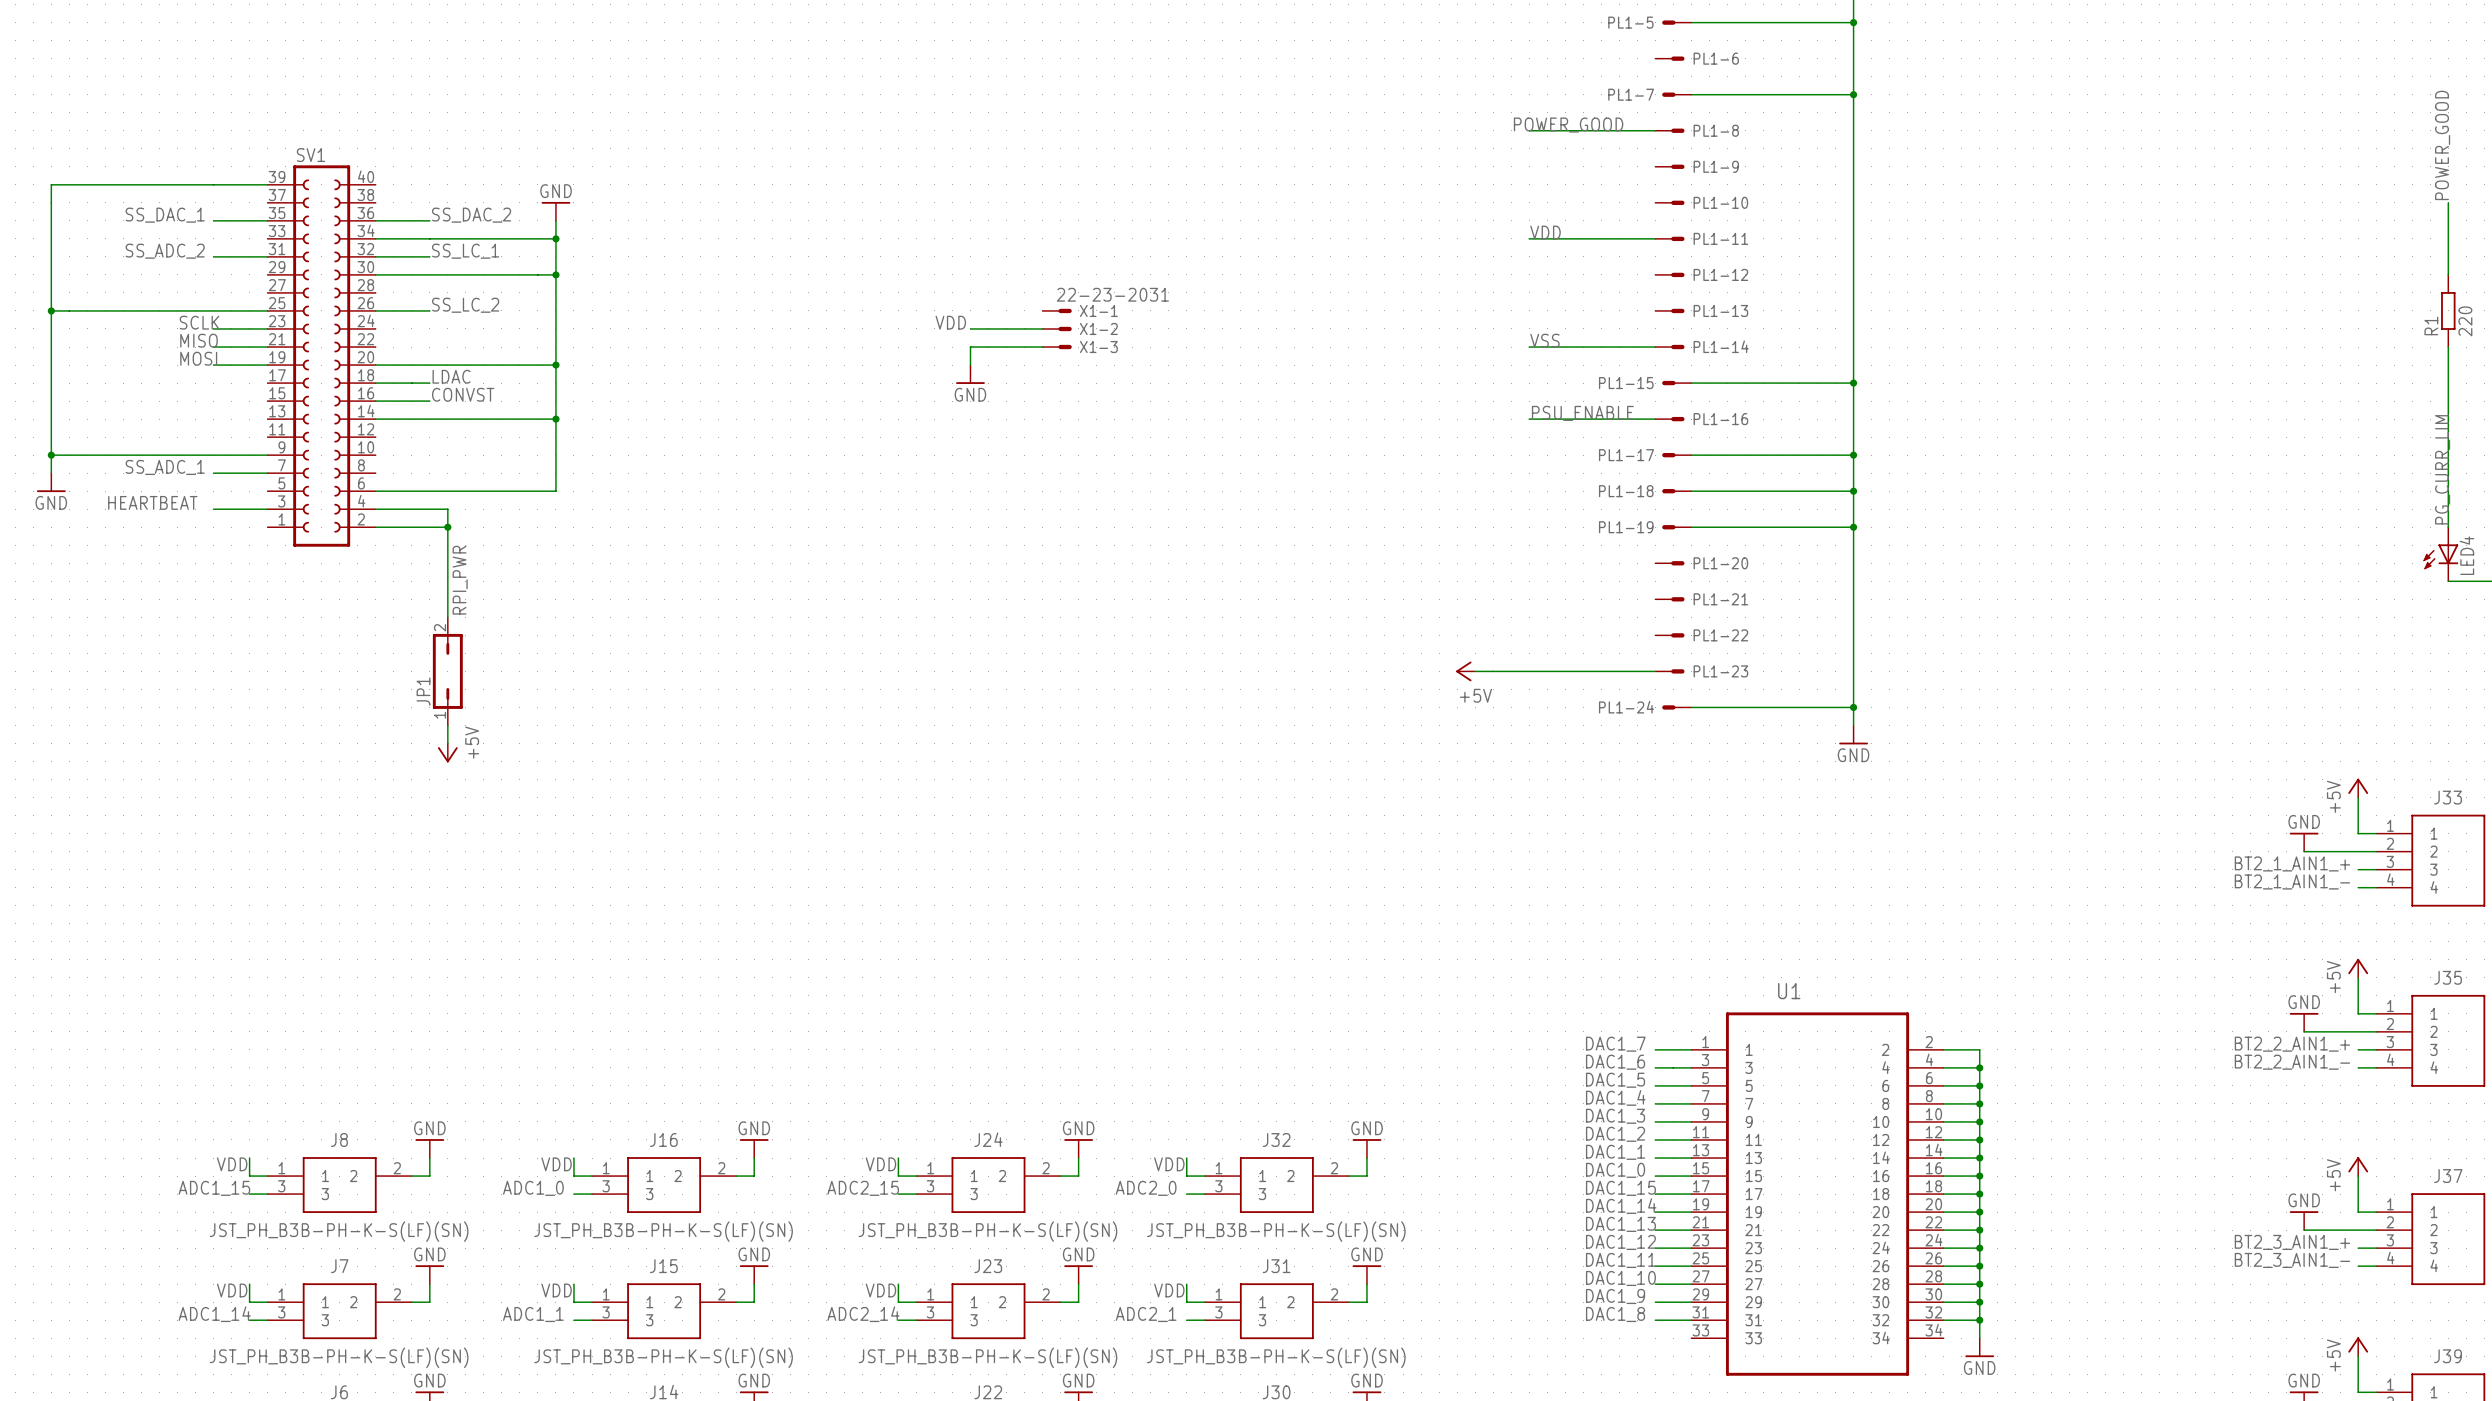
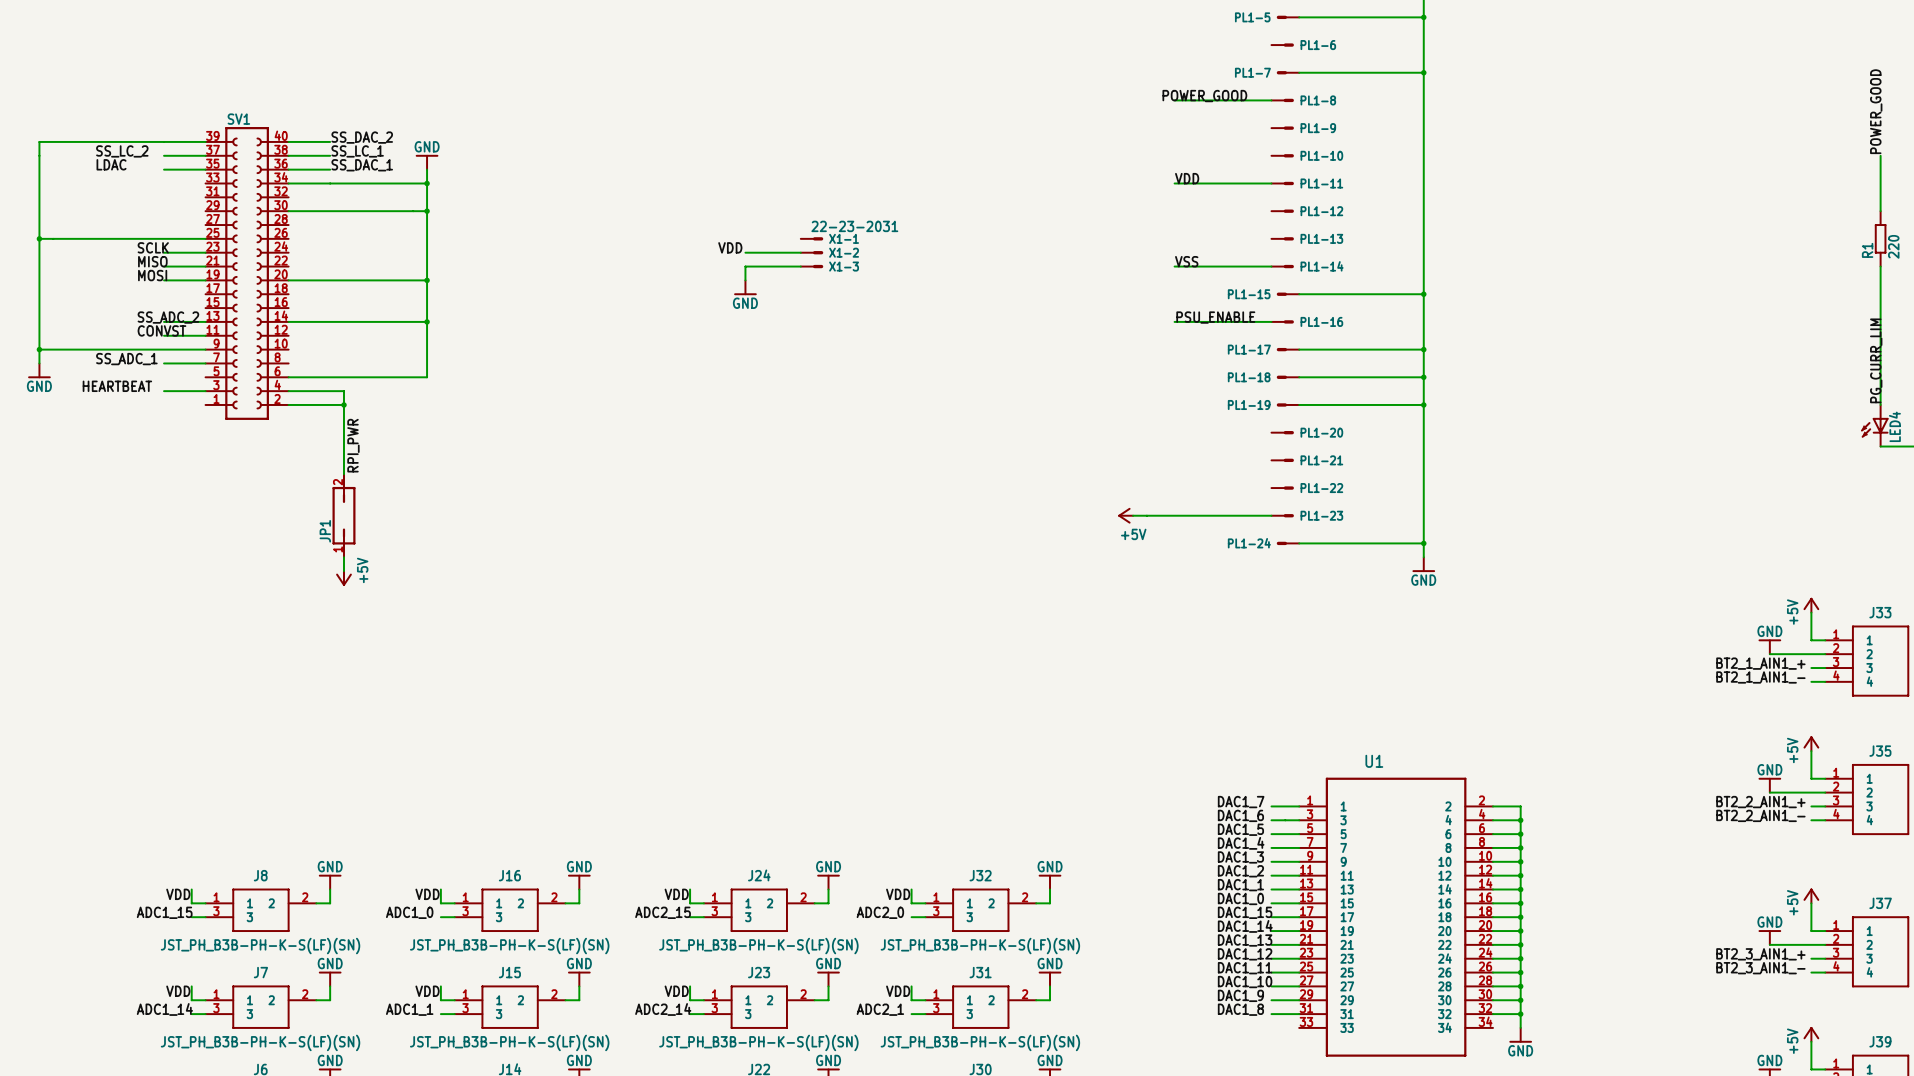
label: none -> SS_DAC_2 (362, 137)
label: none -> SS_LC_2 (122, 151)
label: SS_DAC_1 (165, 215) -> LDAC (111, 164)
label: SS_DAC_2 (471, 215) -> SS_DAC_1 (362, 165)
label position: SS_ADC_2 (165, 251) -> SS_ADC_2 (168, 317)
label position: SS_LC_1 (465, 251) -> SS_LC_1 (357, 151)
wire: (213, 256) (267, 256) -> (164, 155) (205, 155)
wire: (375, 256) (429, 256) -> (288, 155) (330, 155)
label: SS_LC_2 (465, 305) -> none
wire: (375, 310) (429, 310) -> (288, 141) (330, 141)
label: LDAC (451, 376) -> none
wire: (375, 383) (429, 383) -> (164, 321) (205, 321)
label: CONVST (463, 394) -> none
wire: (375, 401) (429, 401) -> (164, 335) (205, 335)
label: none -> CONVST (161, 330)

